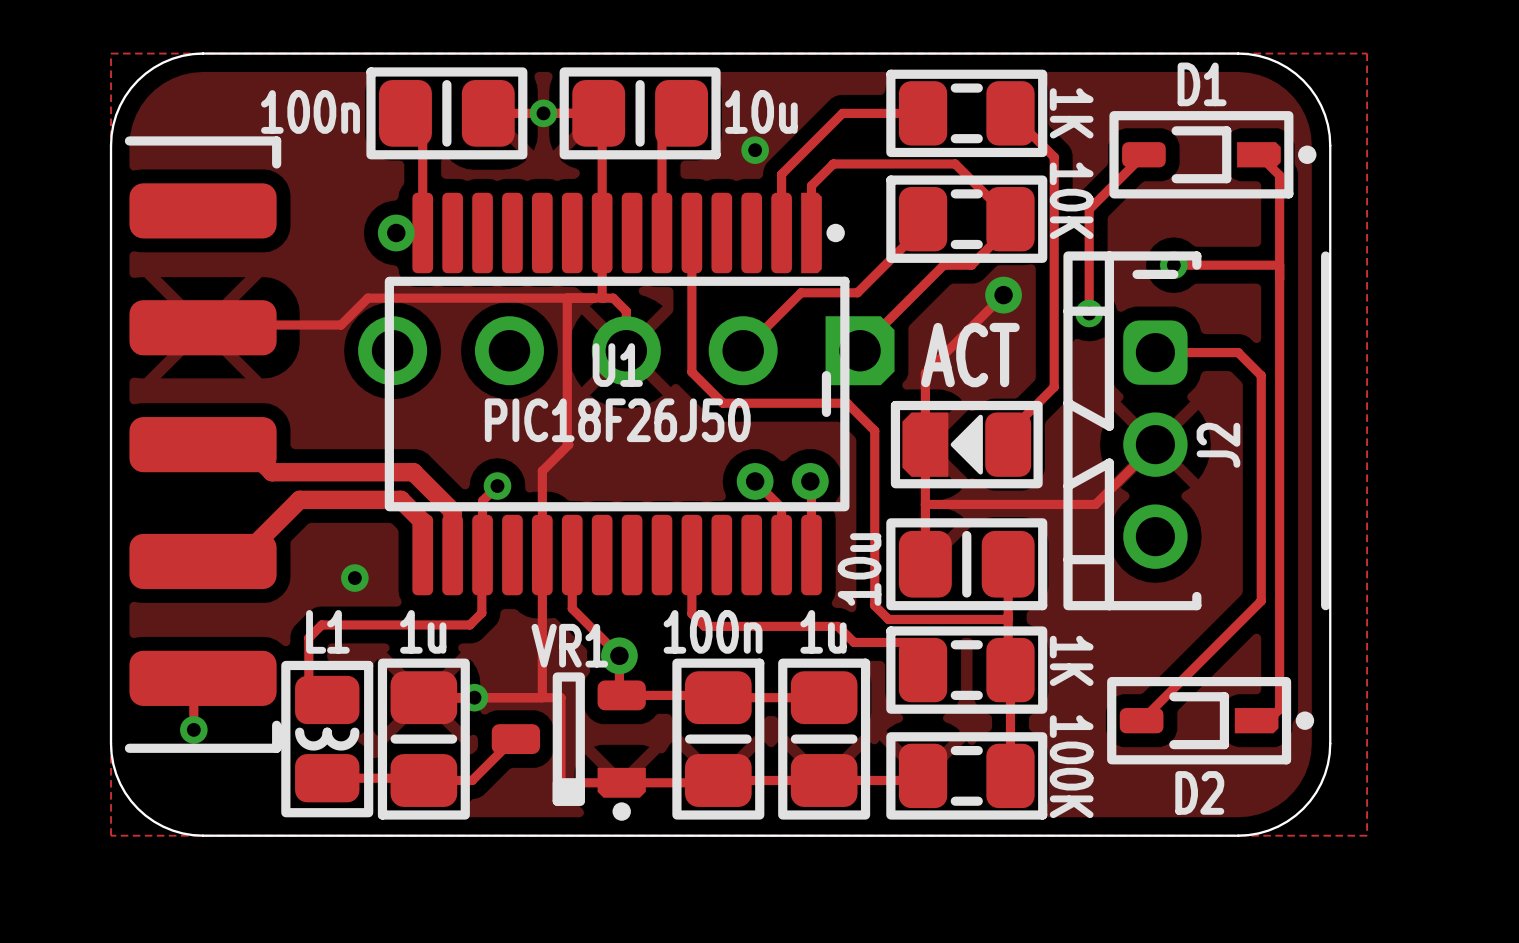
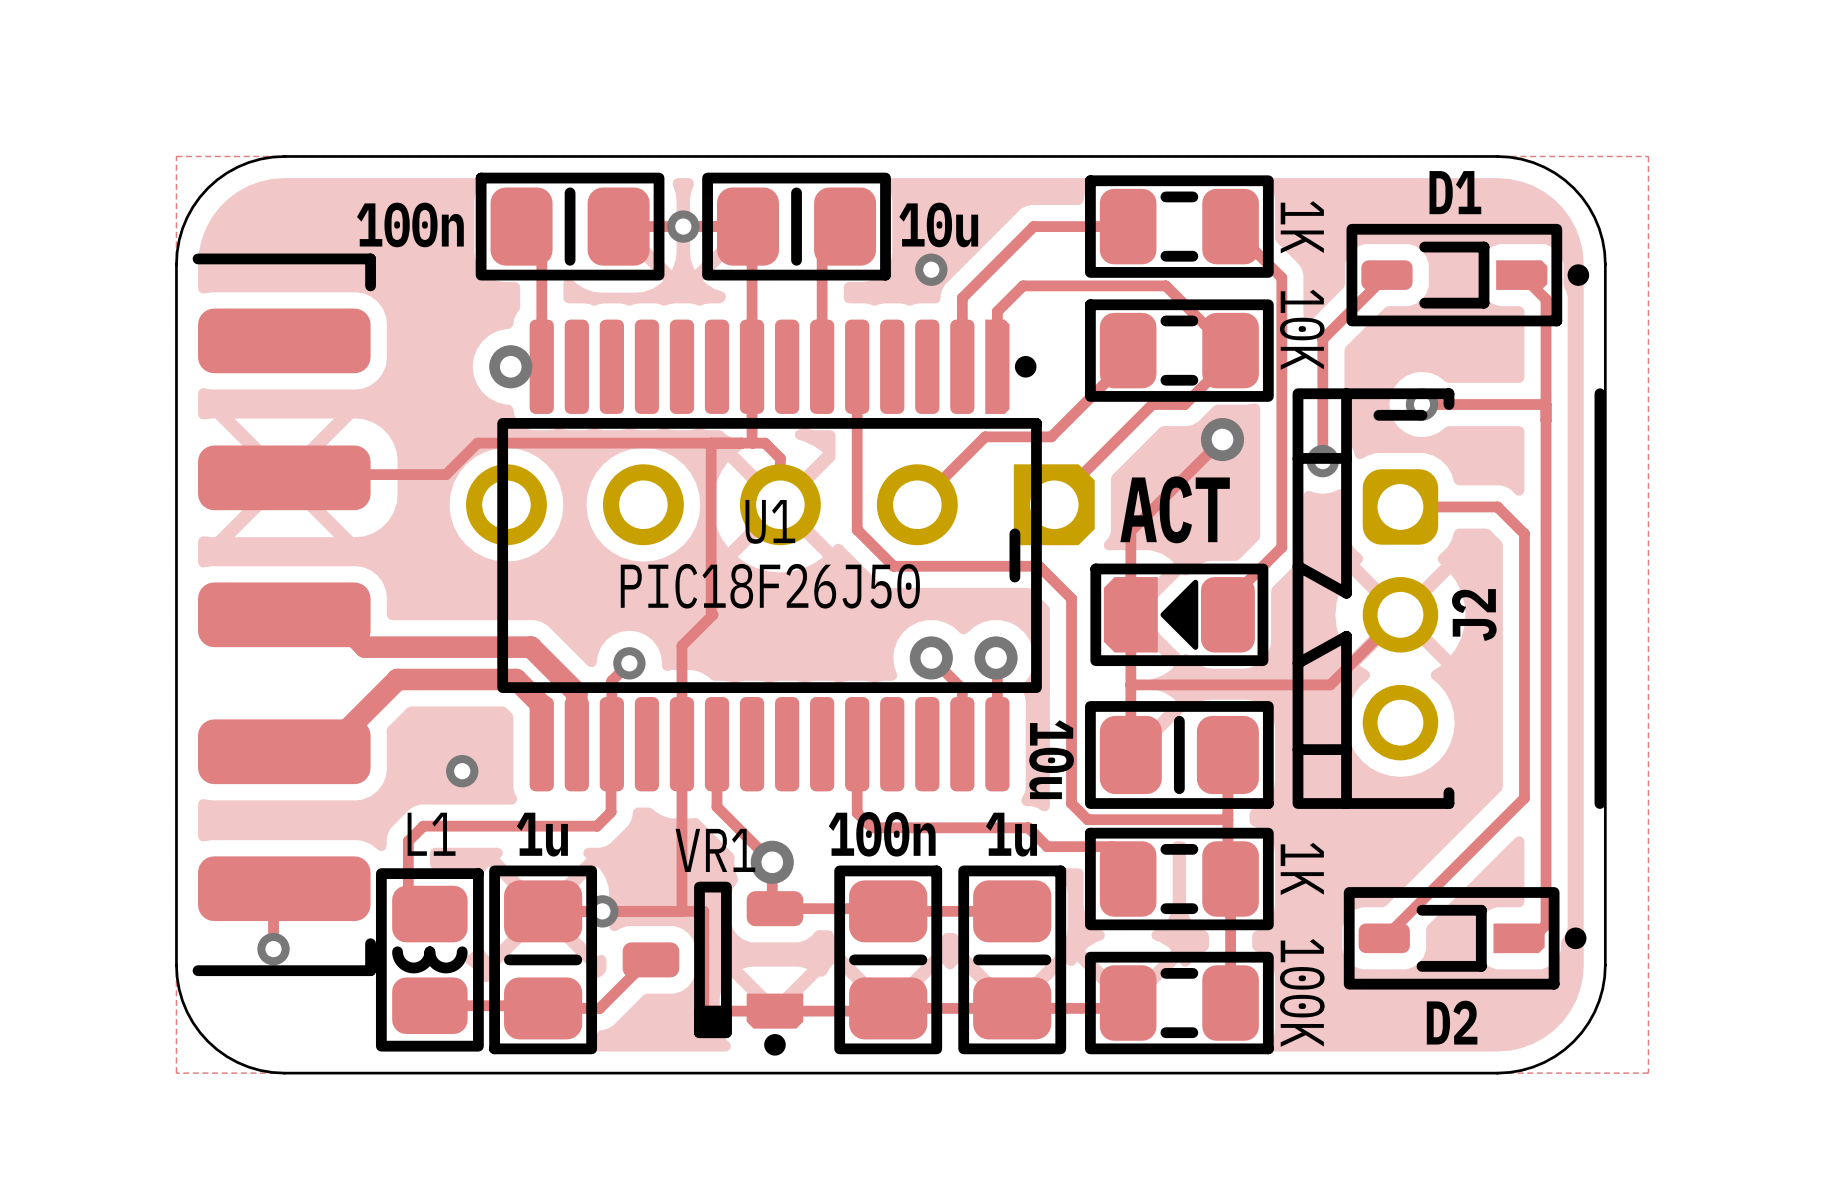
part value rotation: 0° (859, 569) -> 180° (1051, 759)

